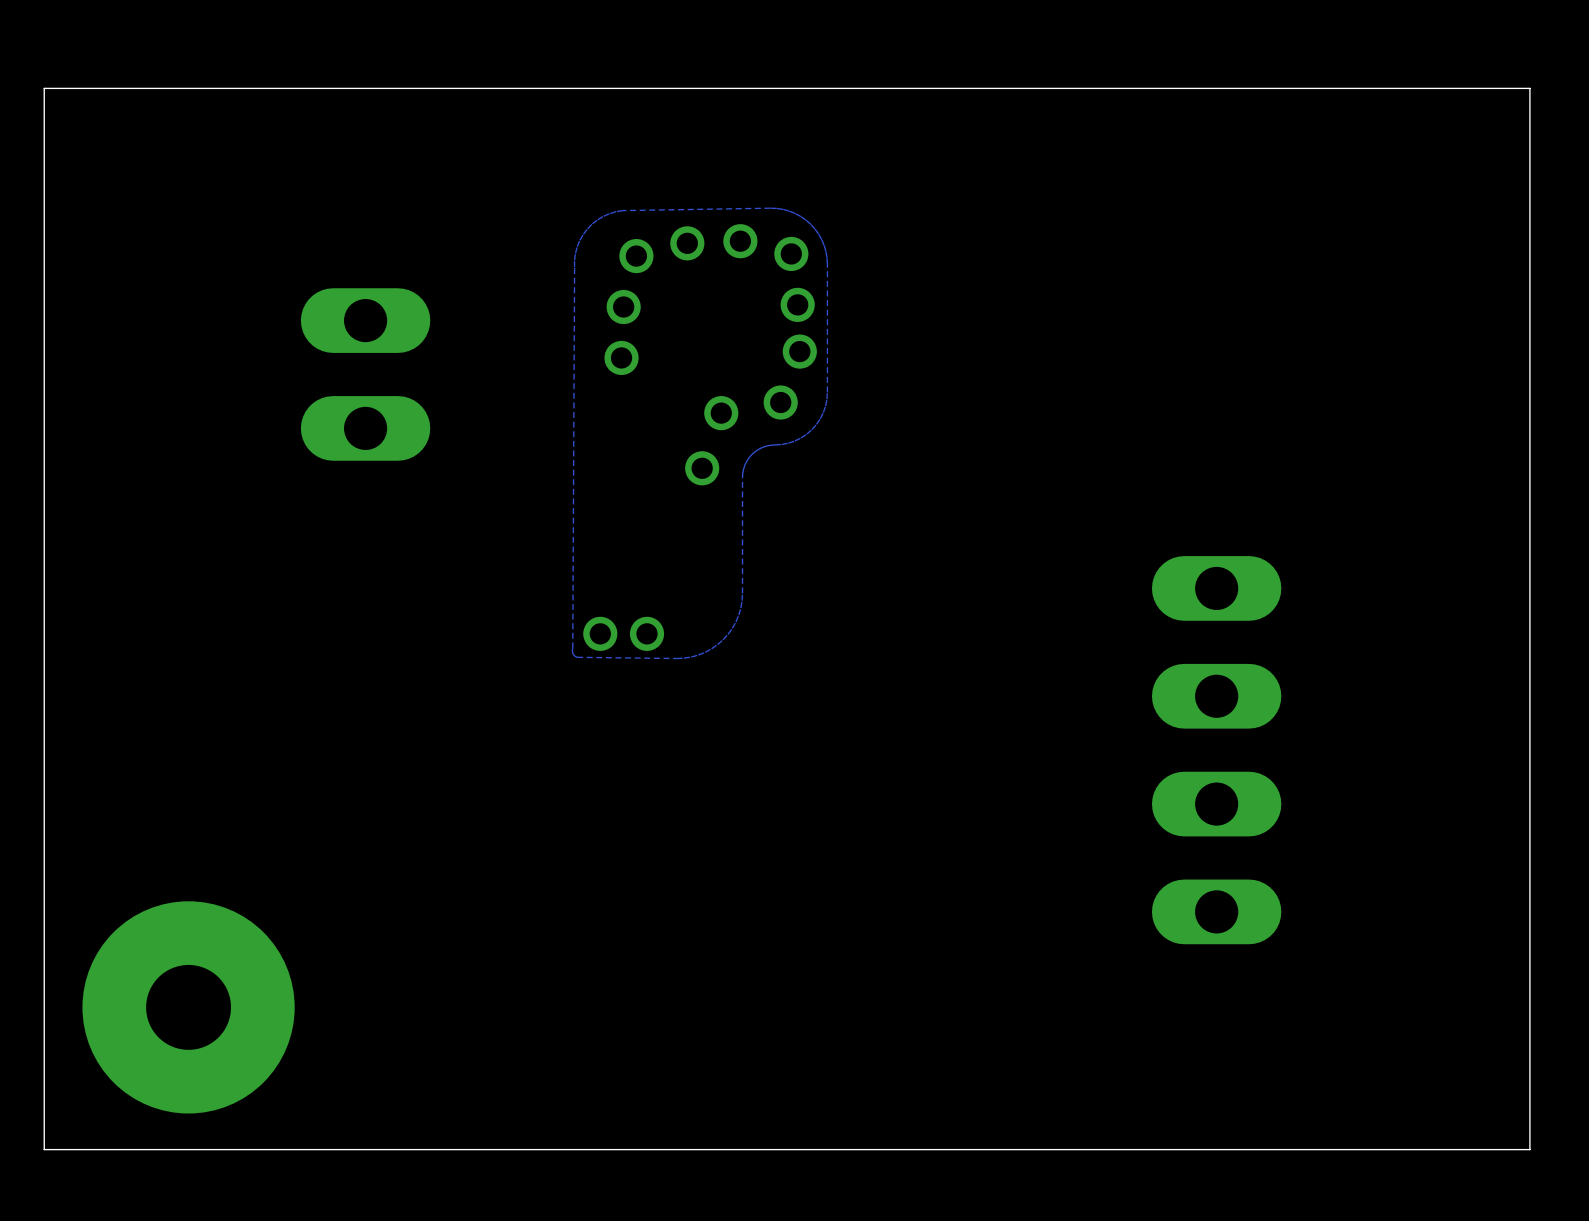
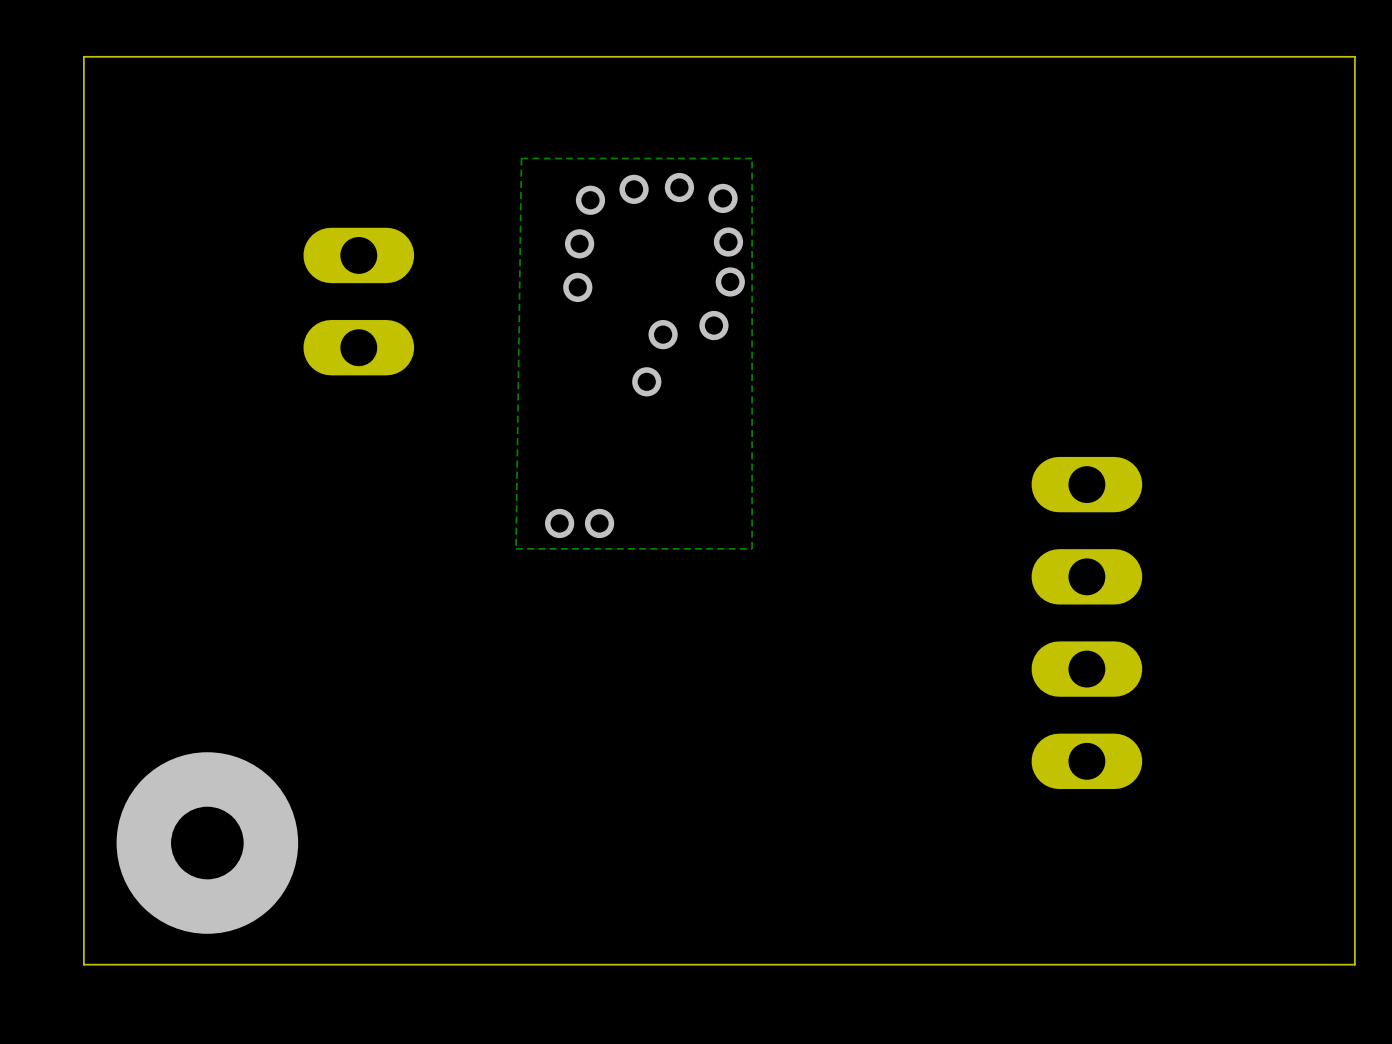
zone outline: (770, 208) (789, 211) (805, 220) (814, 228) (824, 245) (827, 264) (826, 399) (820, 418) (806, 434) (788, 443) (766, 446) (758, 449) (749, 457) (744, 464) (742, 477) (742, 600) (735, 621) (728, 634) (717, 644) (705, 652) (691, 657) (576, 656) (572, 651) (574, 261) (579, 241) (587, 229) (597, 220) (616, 211) (770, 208) -> (752, 158) (752, 548) (516, 548) (521, 158) (752, 158)

